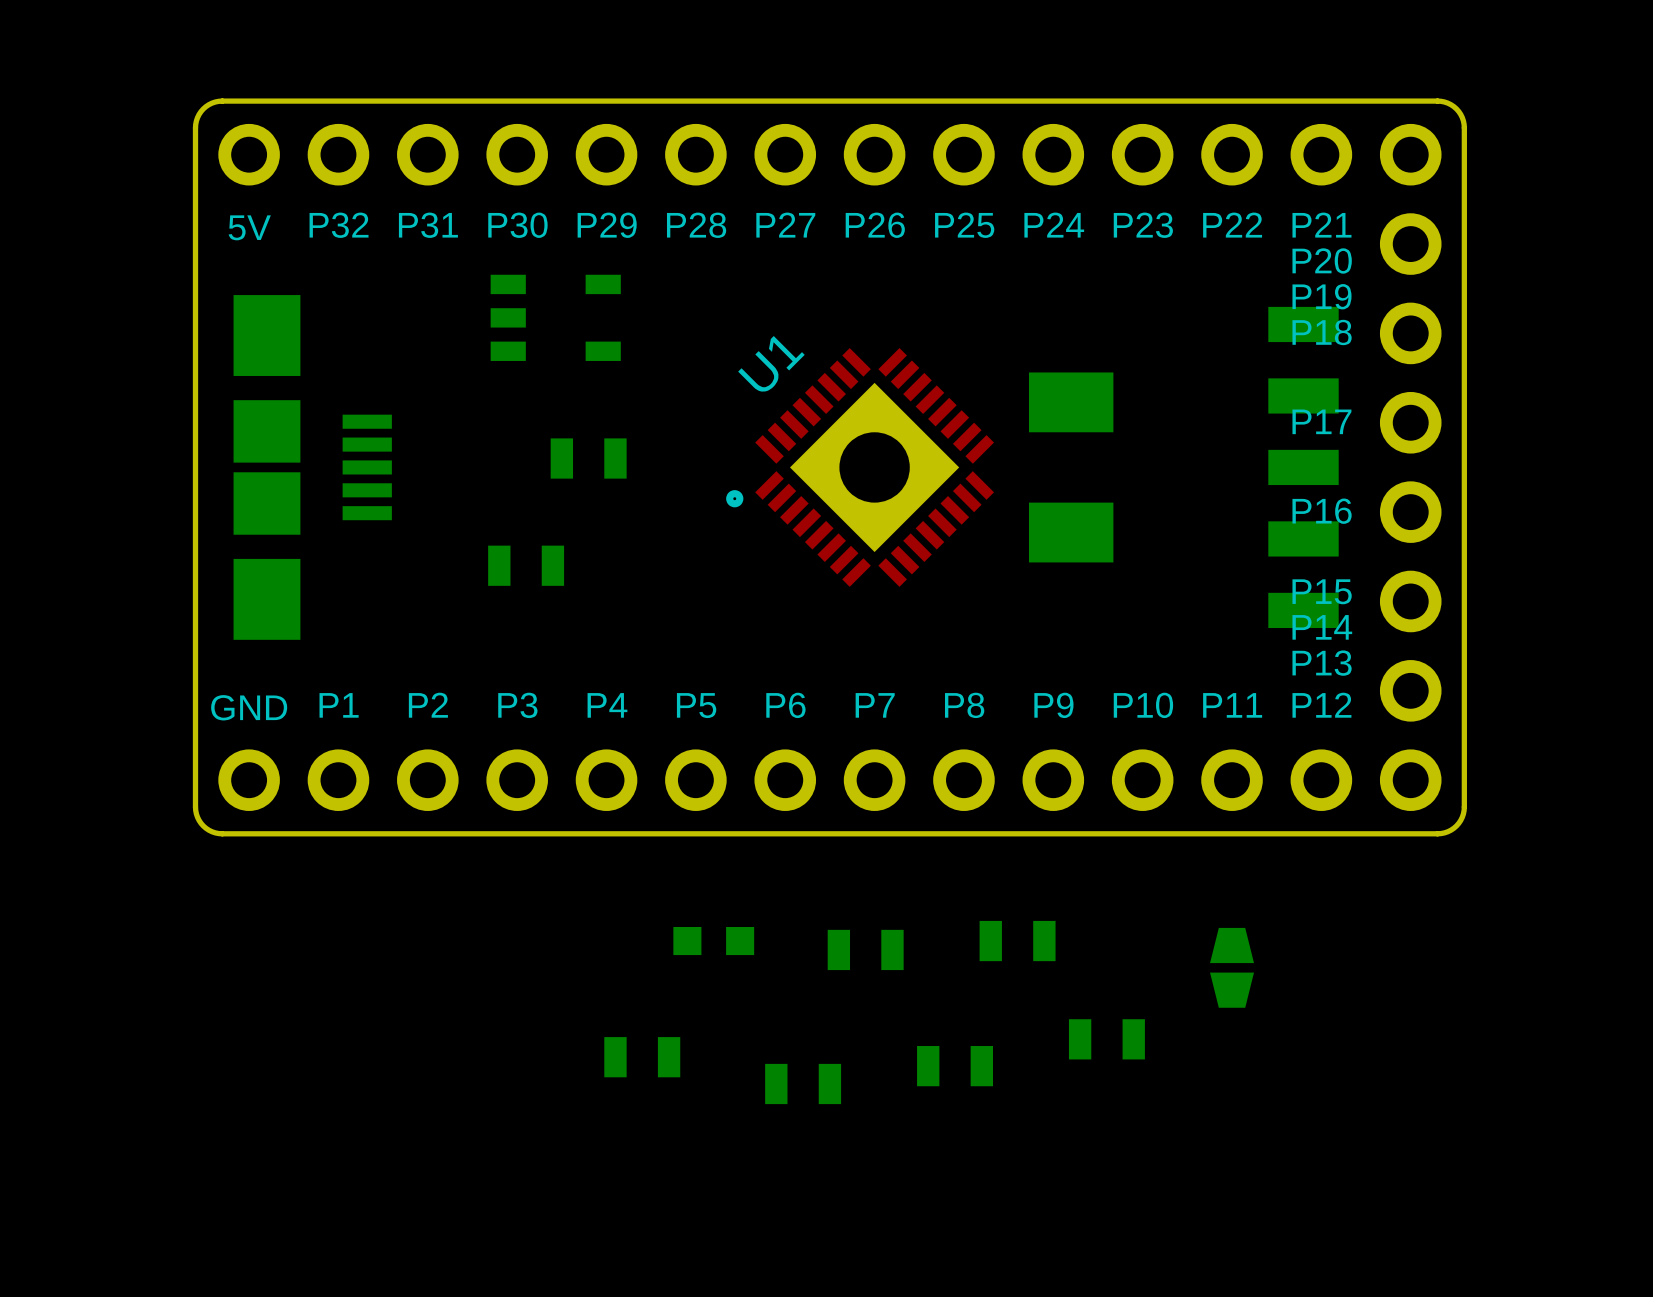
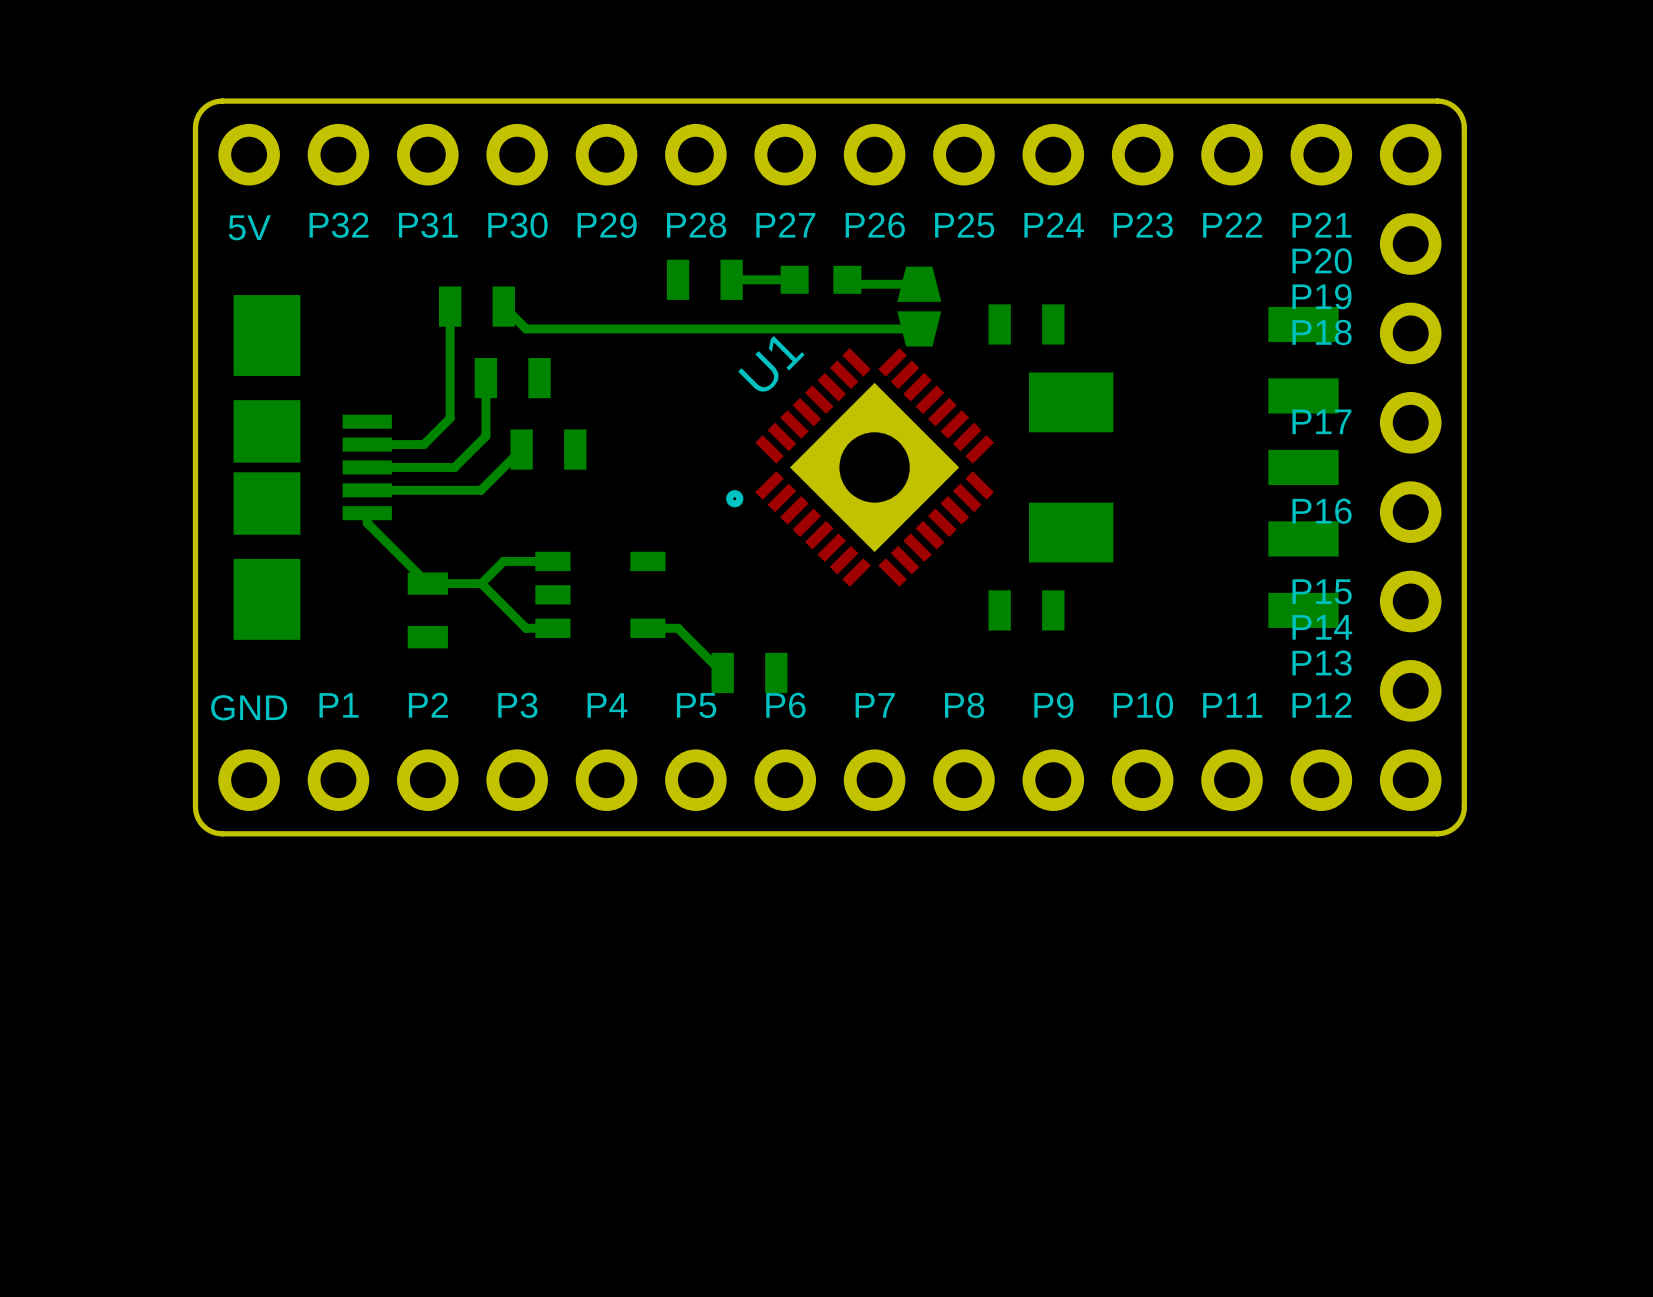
part: none -> (704, 279)
bottom track: none -> (731, 279) (794, 279)
bottom track: none -> (847, 279) (851, 284) (919, 284)
bottom track: none -> (450, 306) (450, 418) (423, 444) (367, 444)
part: none -> (476, 306)
bottom track: none -> (503, 306) (526, 328) (919, 328)
part position: (555, 317) -> (600, 594)
part: none -> (1026, 324)
bottom track: none -> (485, 378) (485, 436) (454, 467) (367, 467)
part: none -> (512, 378)
bottom track: none -> (521, 449) (480, 490) (367, 490)
part position: (588, 458) -> (548, 449)
bottom track: none -> (367, 513) (367, 523) (427, 583) (481, 583)
bottom track: none -> (503, 561) (552, 561)
bottom track: none -> (503, 561) (481, 583)
part: (526, 565) -> none
bottom track: none -> (481, 583) (526, 628) (552, 628)
part: none -> (427, 610)
part: none -> (1026, 610)
bottom track: none -> (647, 628) (678, 628) (722, 672)
part: none -> (749, 672)
part position: (713, 941) -> (820, 279)
part: (1017, 941) -> none
part: (865, 949) -> none
part position: (1232, 967) -> (919, 306)
part: (1106, 1039) -> none
part: (642, 1057) -> none
part: (955, 1066) -> none
part: (803, 1084) -> none

